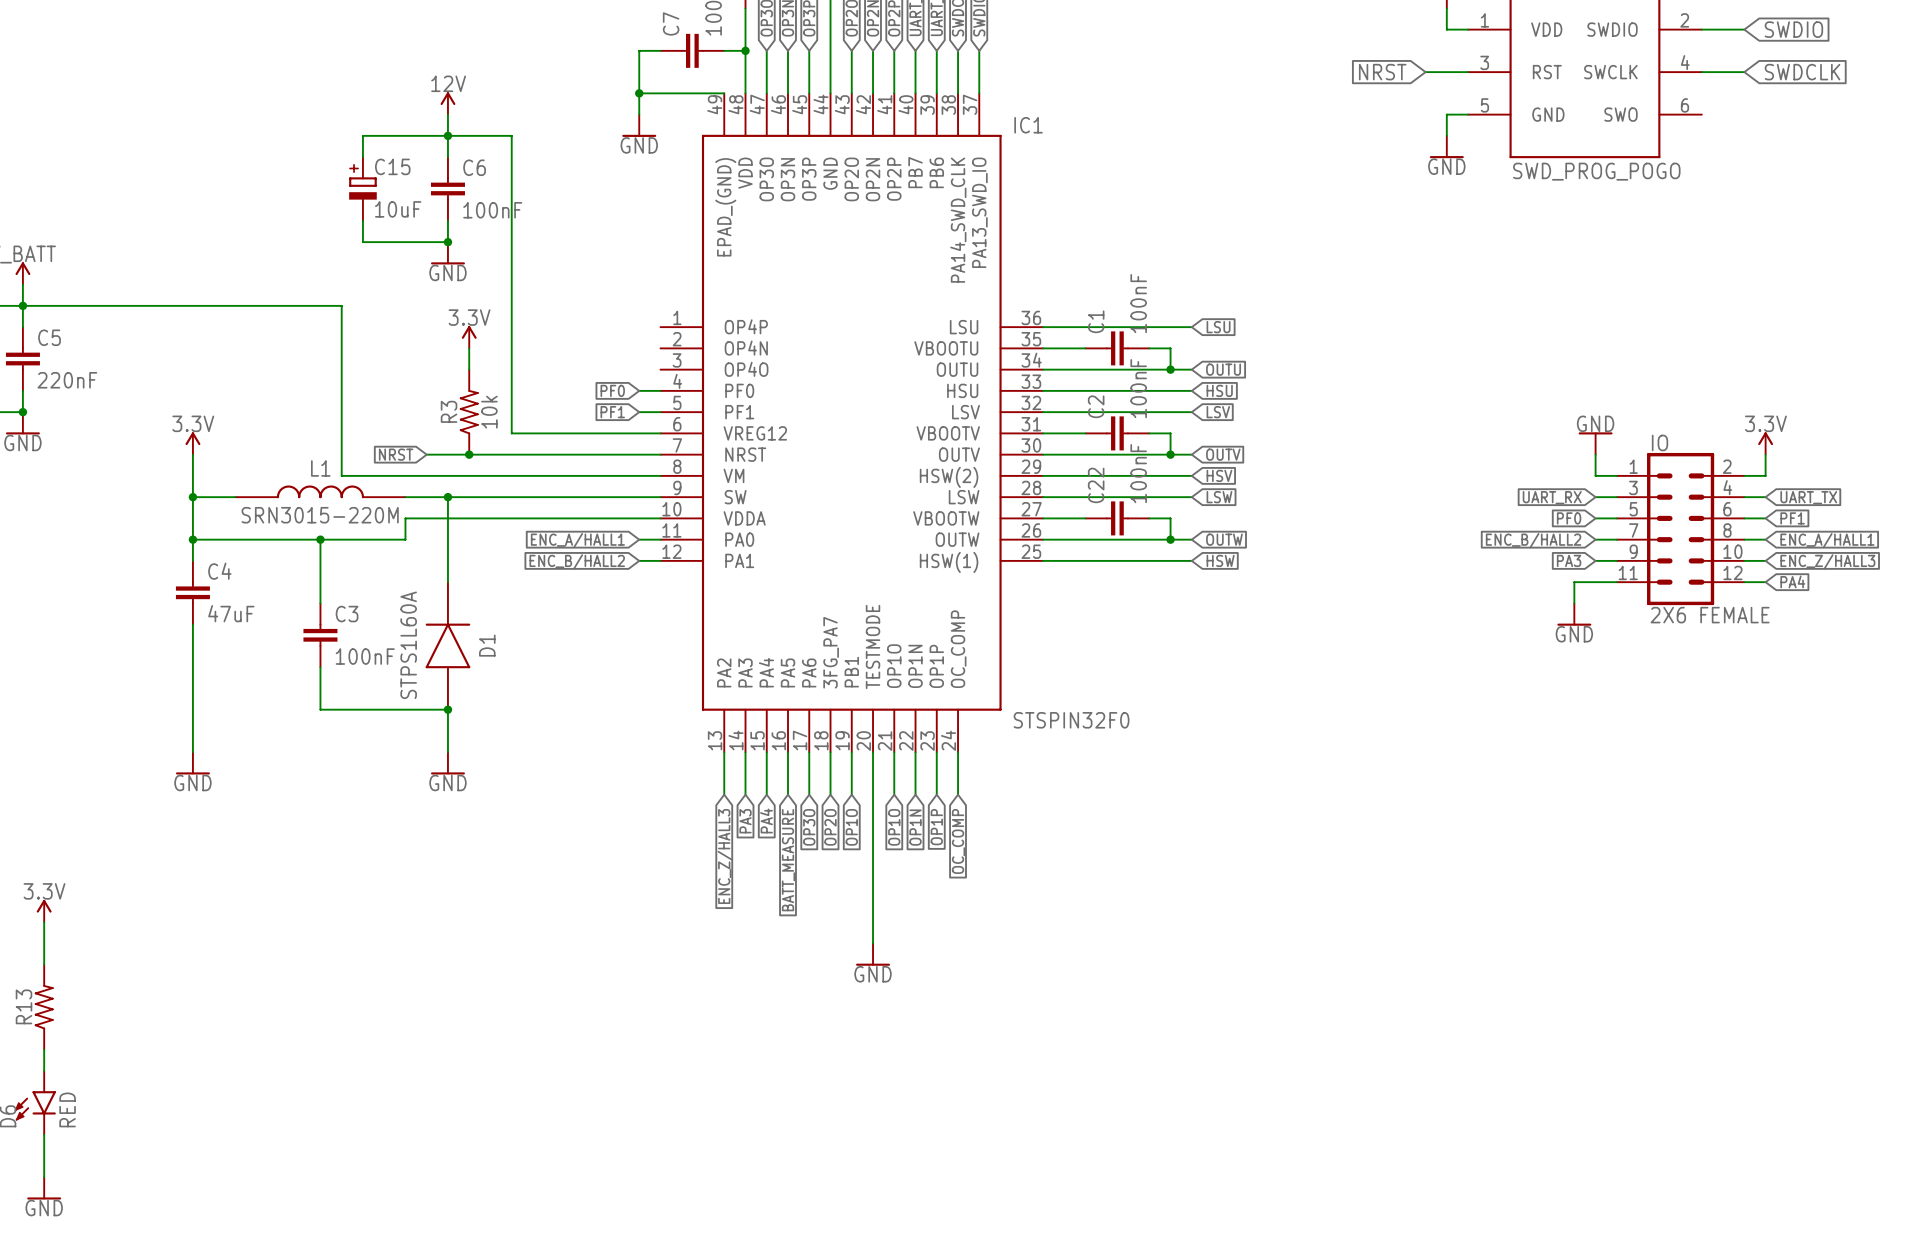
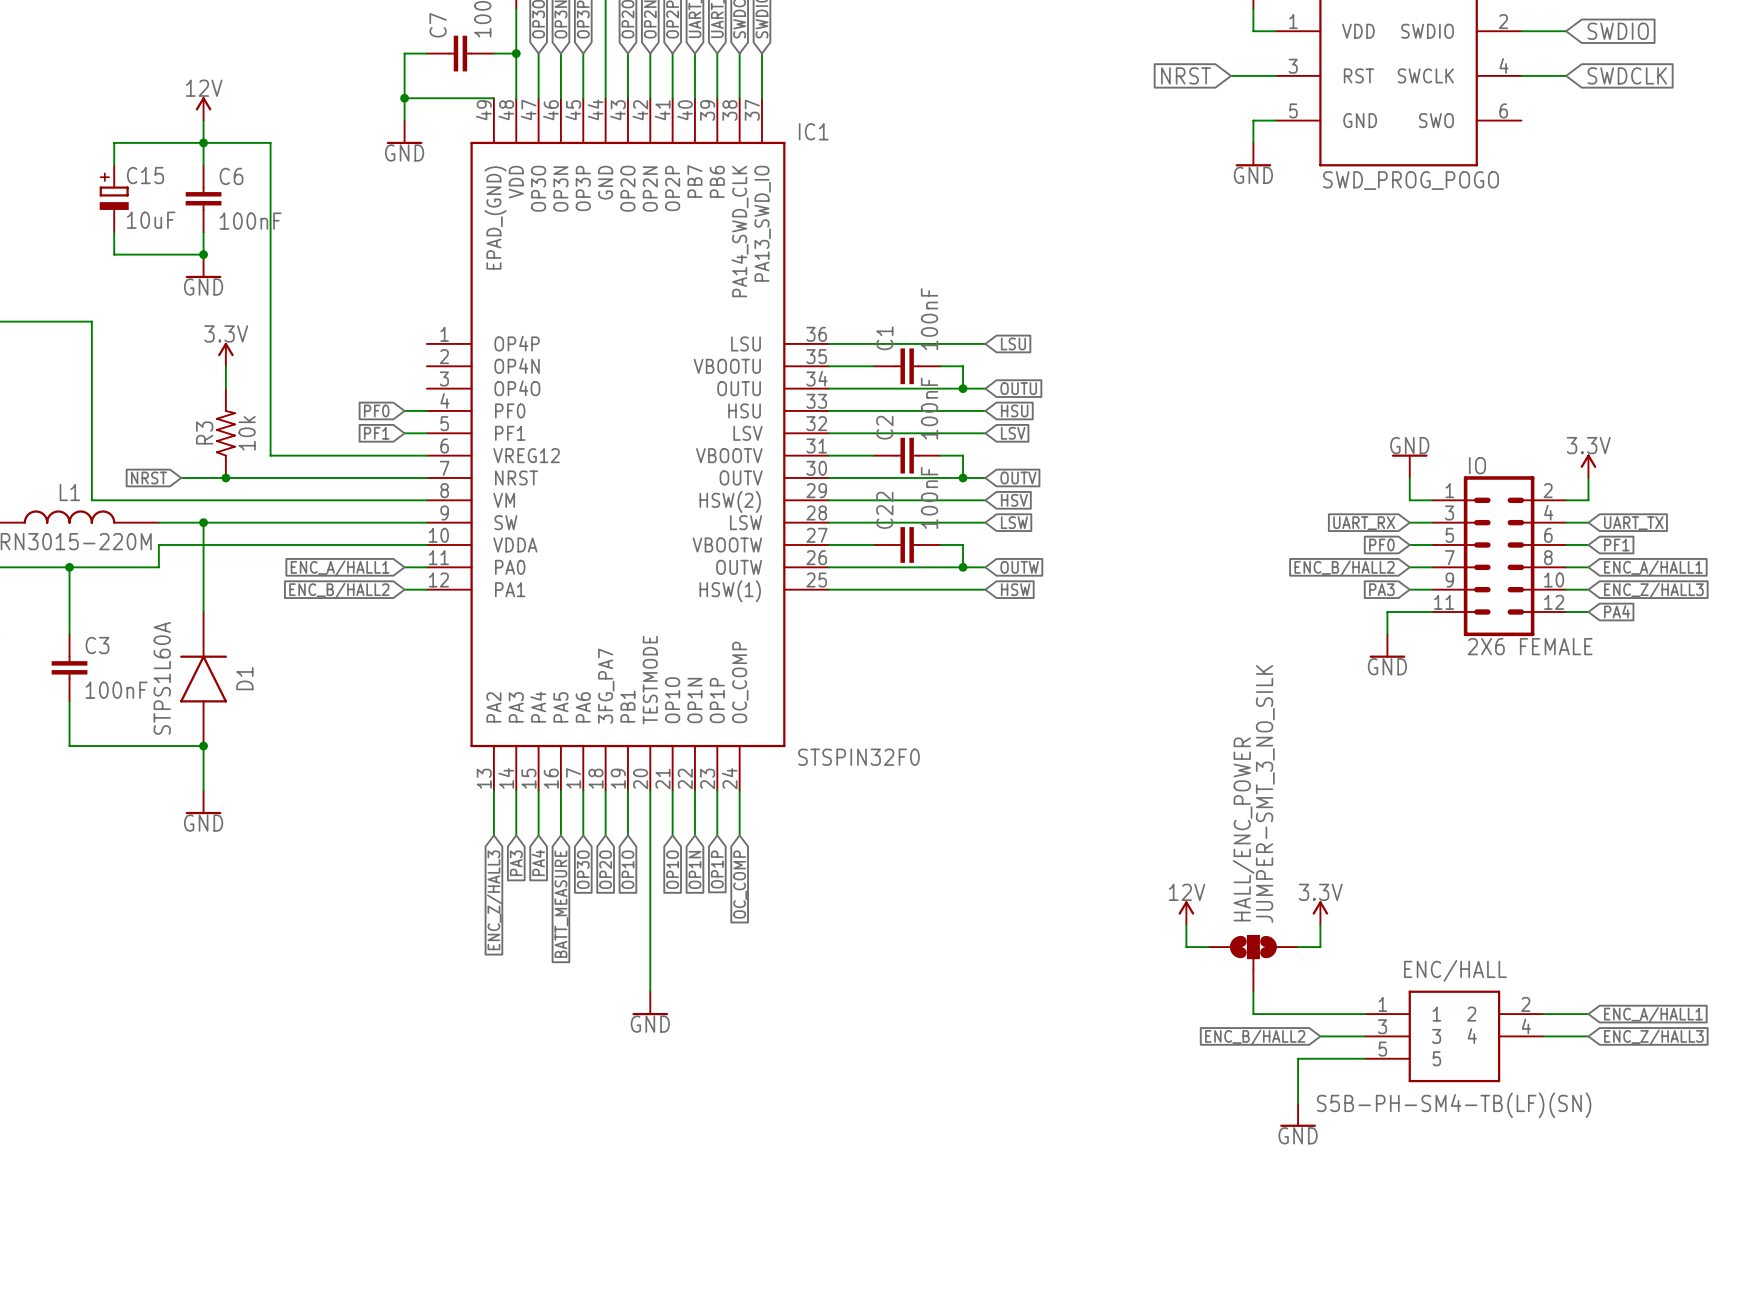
power symbol: none -> 12V (1186, 913)
power symbol: none -> 3.3V (1320, 913)
wire: none -> (1186, 924) (1186, 947) (1208, 947)
wire: none -> (1320, 924) (1320, 947) (1298, 947)
HALL/ENC_POWER: none -> JUMPER-SMT_3_NO_SILK (1253, 963)
wire: none -> (1253, 991) (1253, 1014) (1365, 1014)
wire: none -> (1543, 1014) (1588, 1014)
global label: none -> ENC_A/HALL1 (1653, 1015)
wire: none -> (1320, 1036) (1365, 1036)
ENC/HALL: none -> S5B-PH-SM4-TB(LF)(SN) (1454, 1036)
wire: none -> (1543, 1036) (1588, 1036)
global label: none -> ENC_B/HALL2 (1255, 1037)
global label: none -> ENC_Z/HALL3 (1653, 1037)
wire: none -> (1365, 1058) (1298, 1058) (1298, 1103)
power symbol: none -> GND (1298, 1115)

